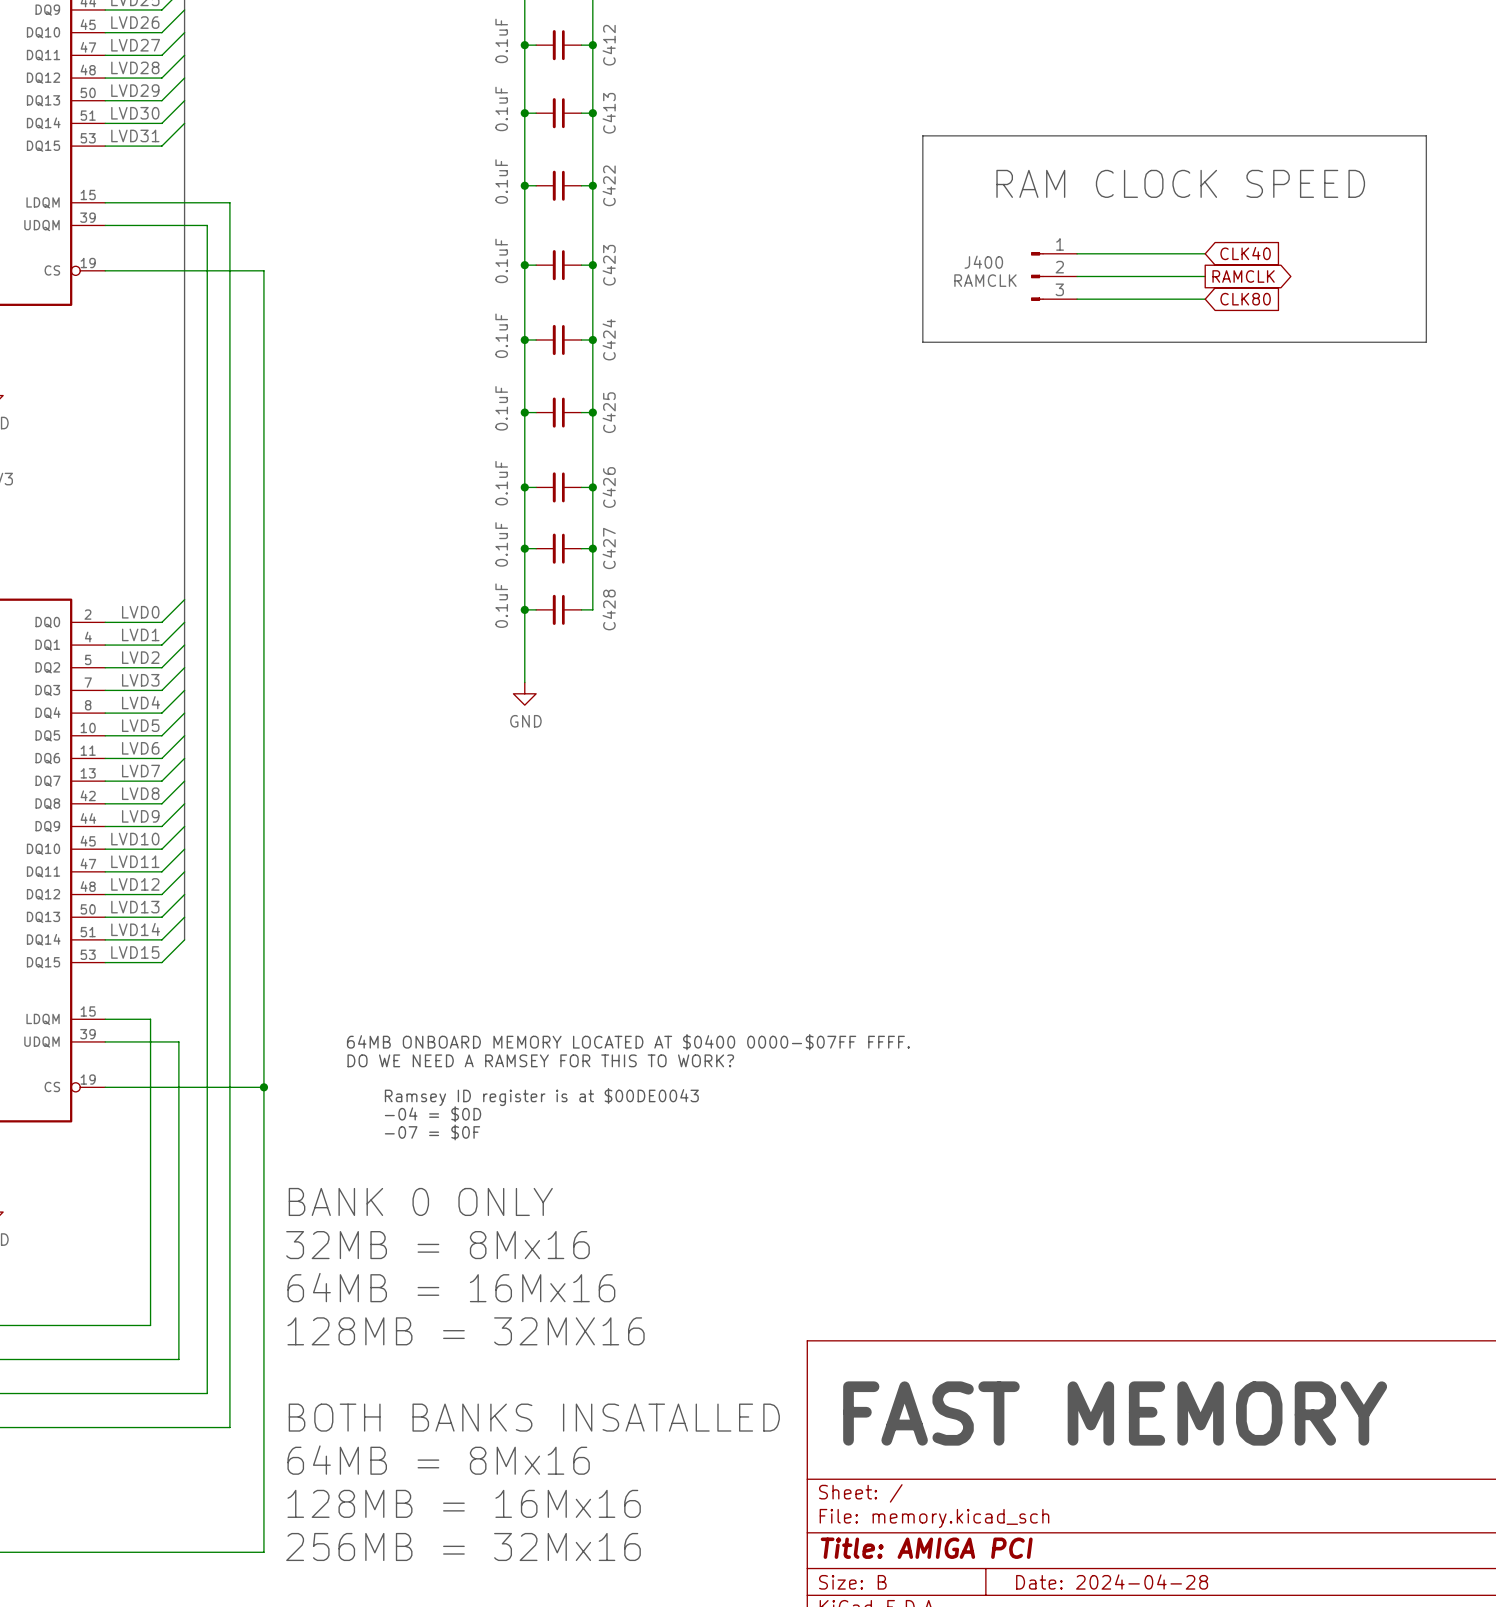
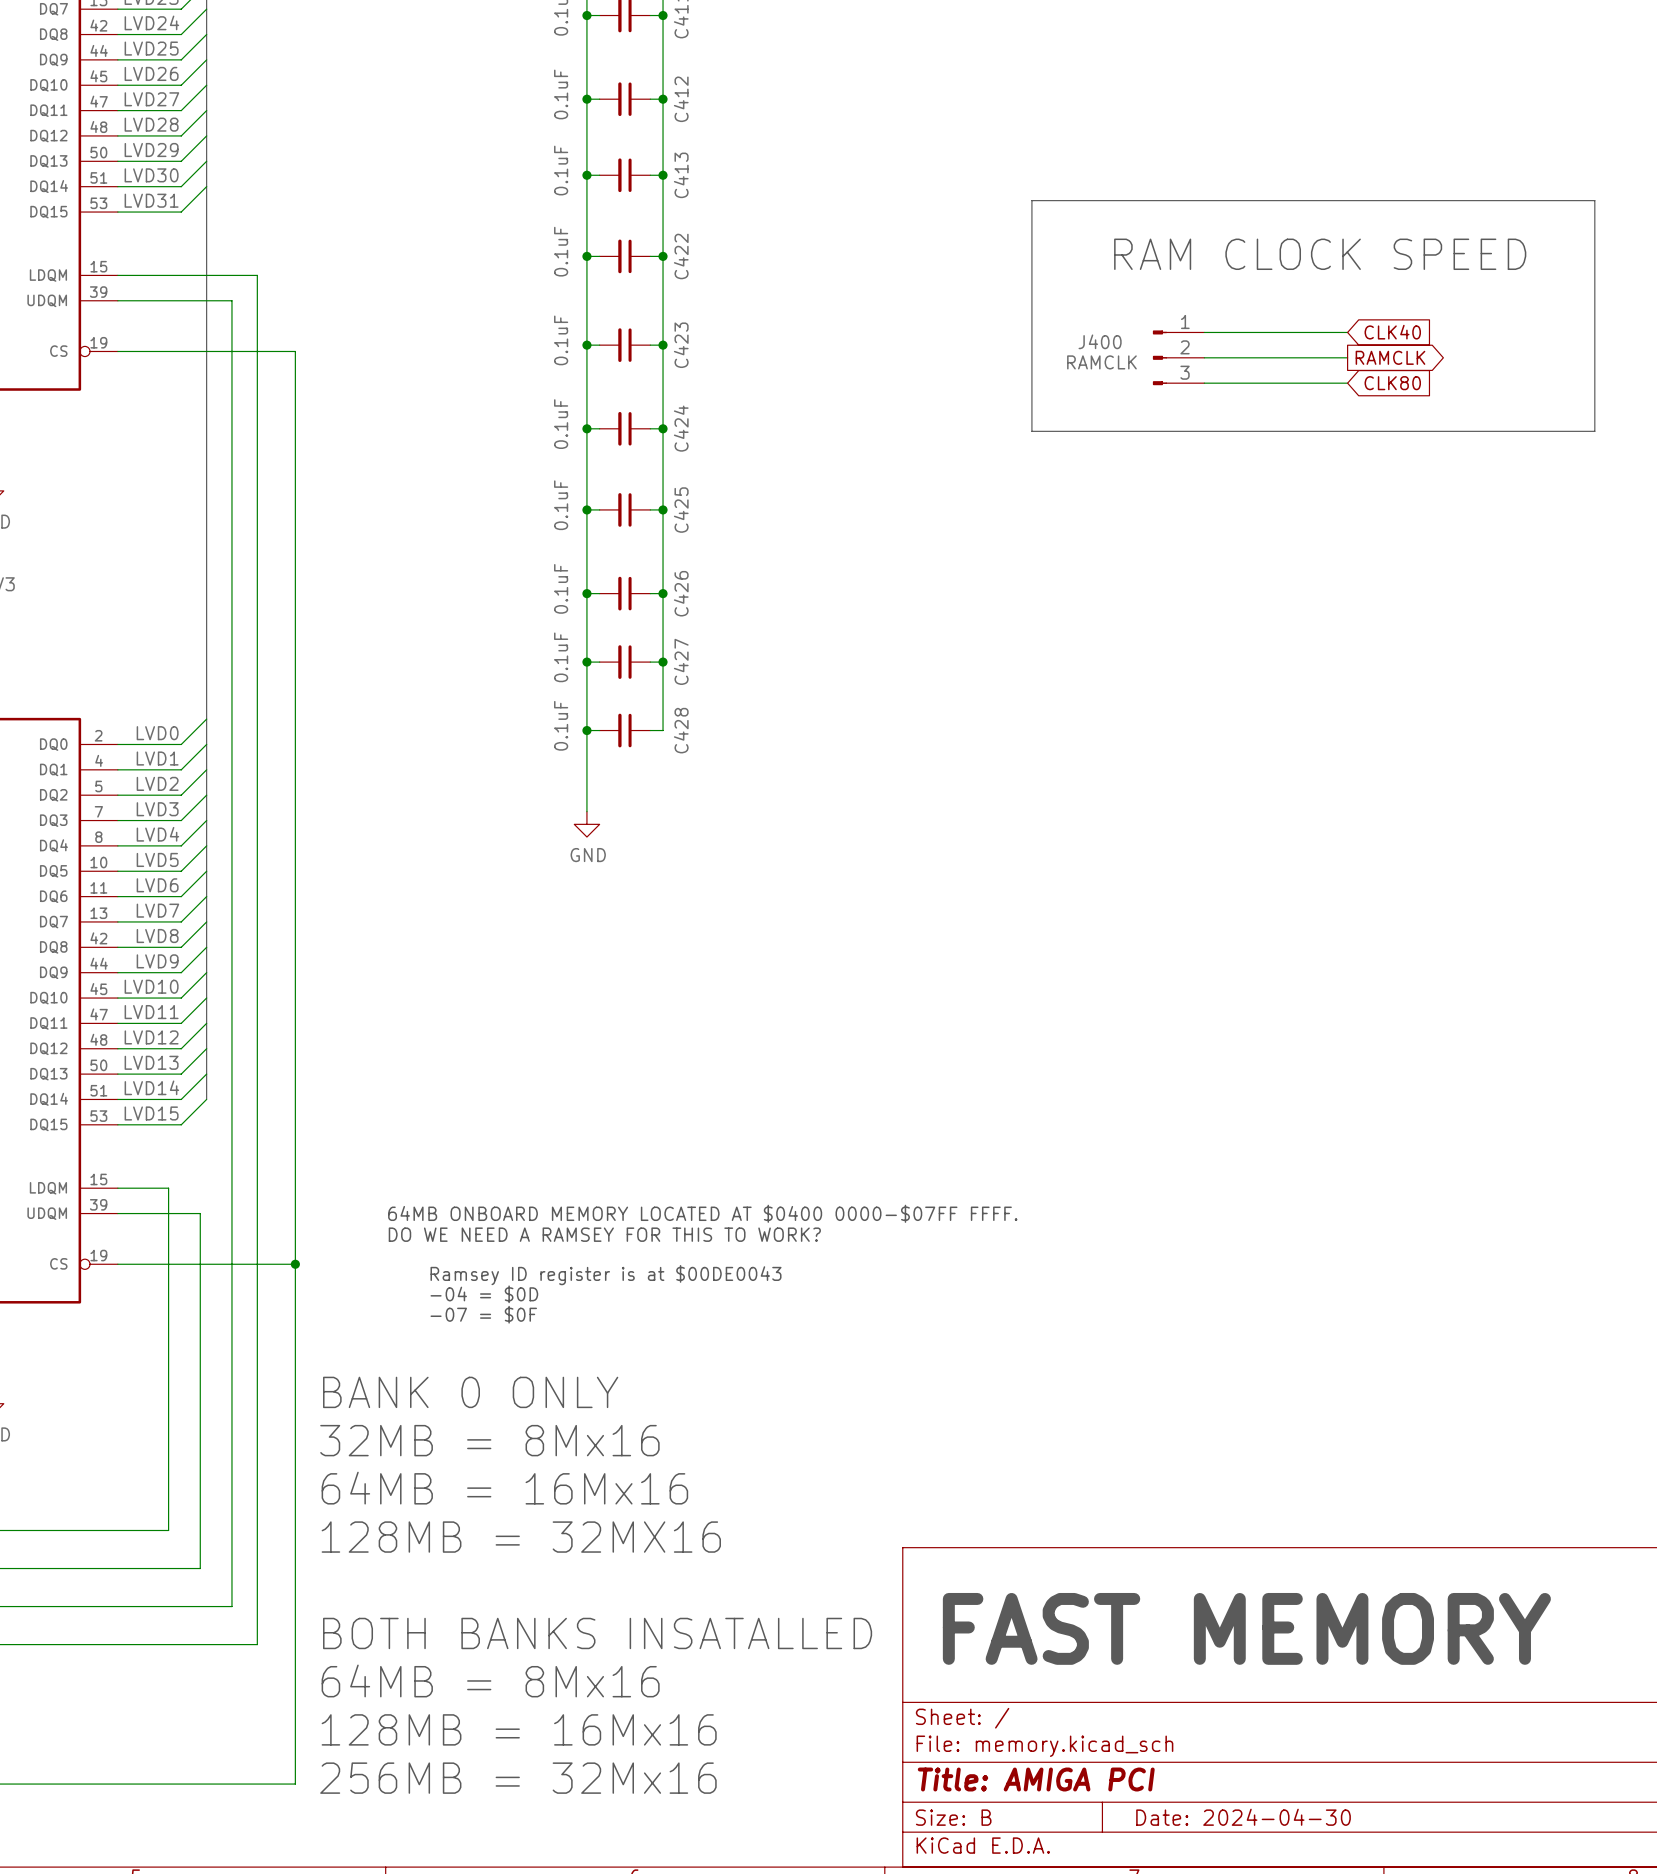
title block: Date: 2024-04-28 (1112, 1582) -> Date: 2024-04-30 (1243, 1817)

